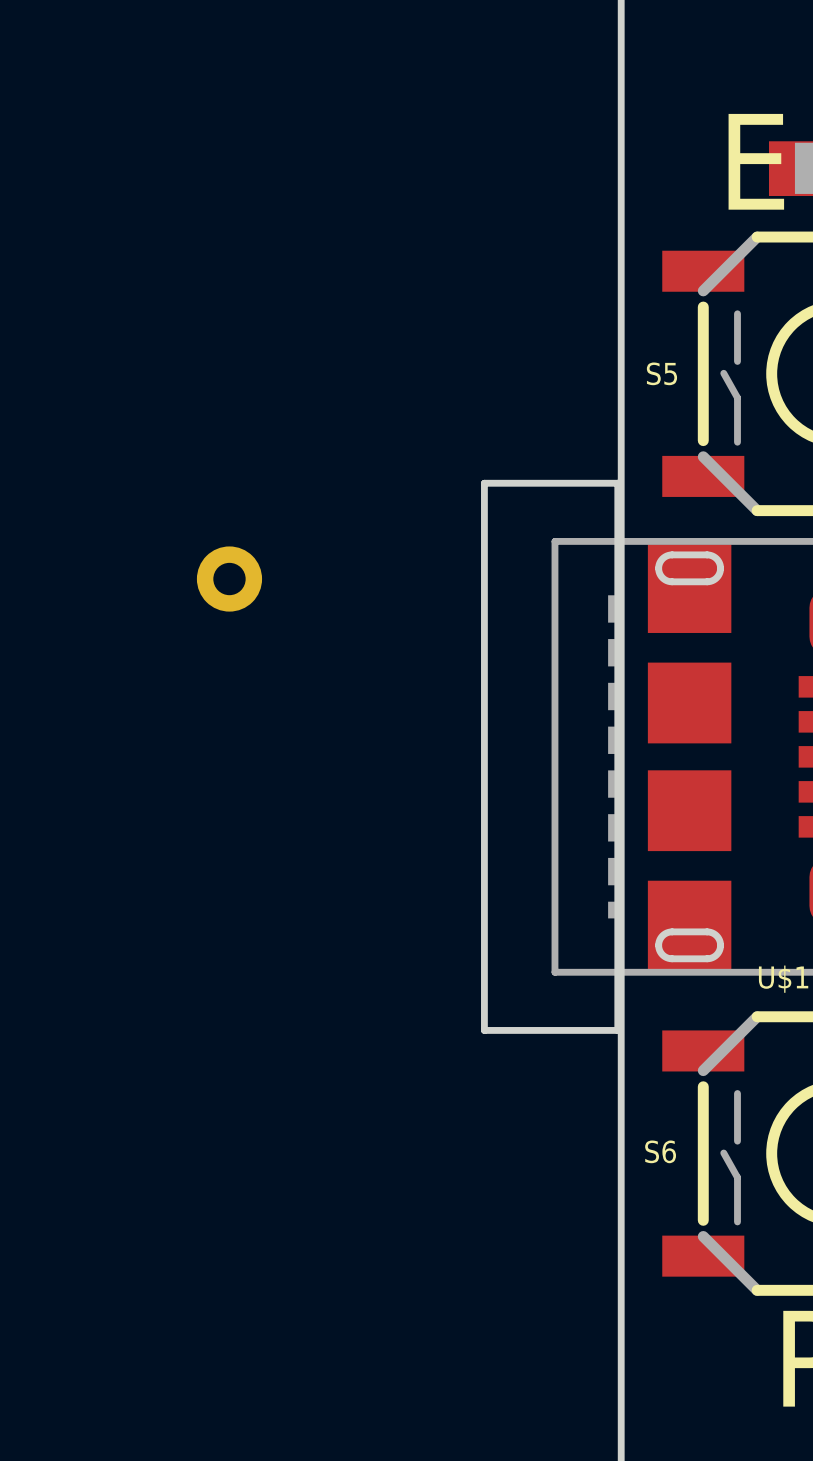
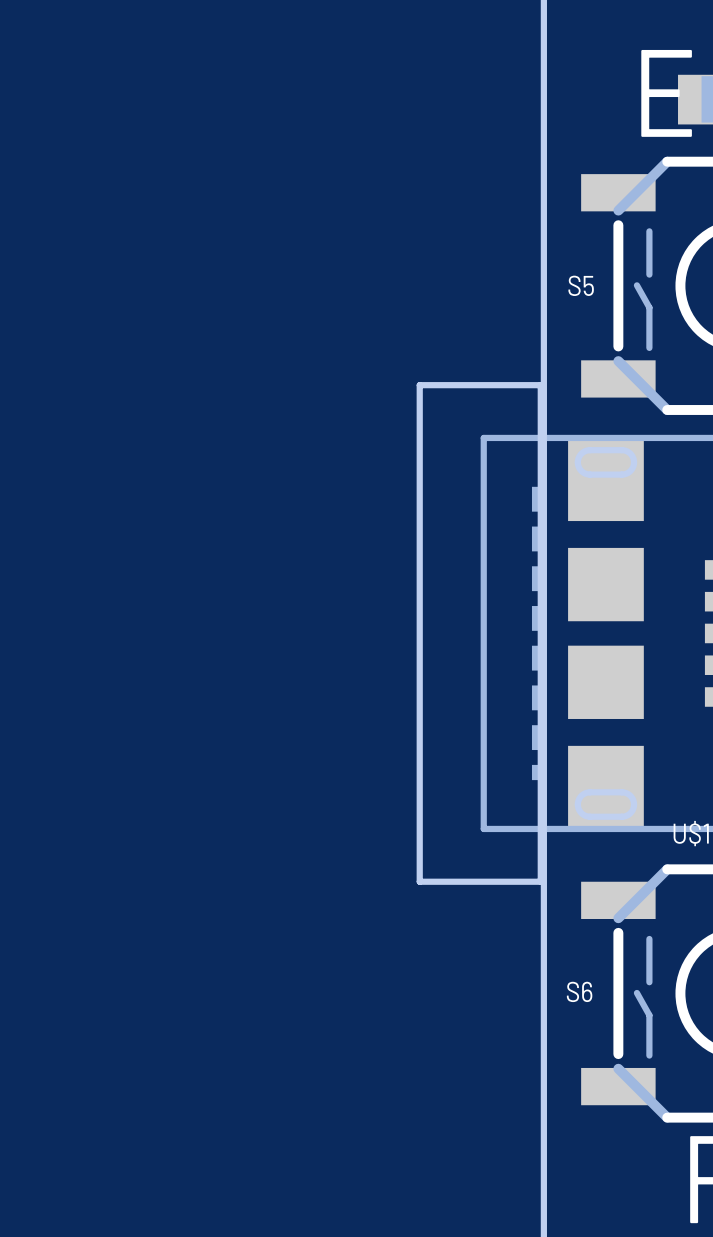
part: (229, 579) -> none

